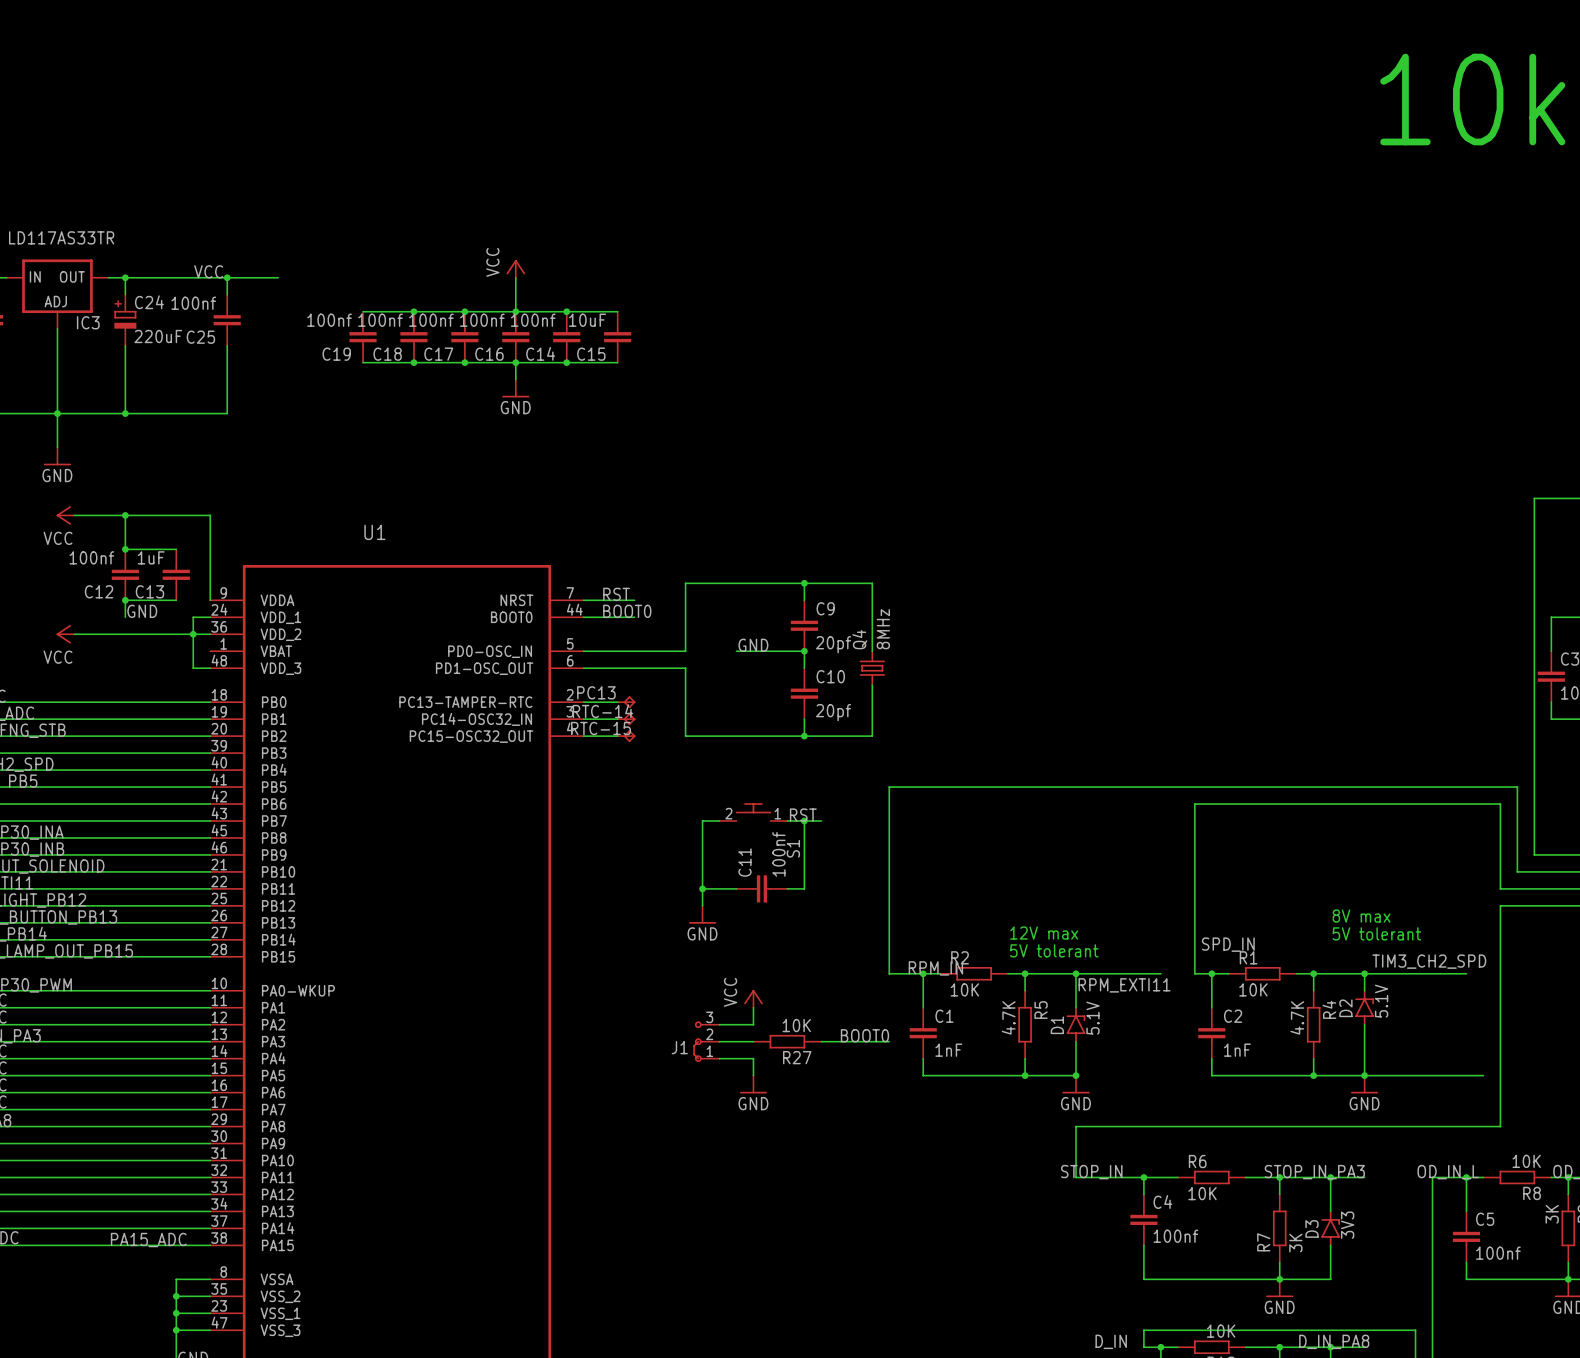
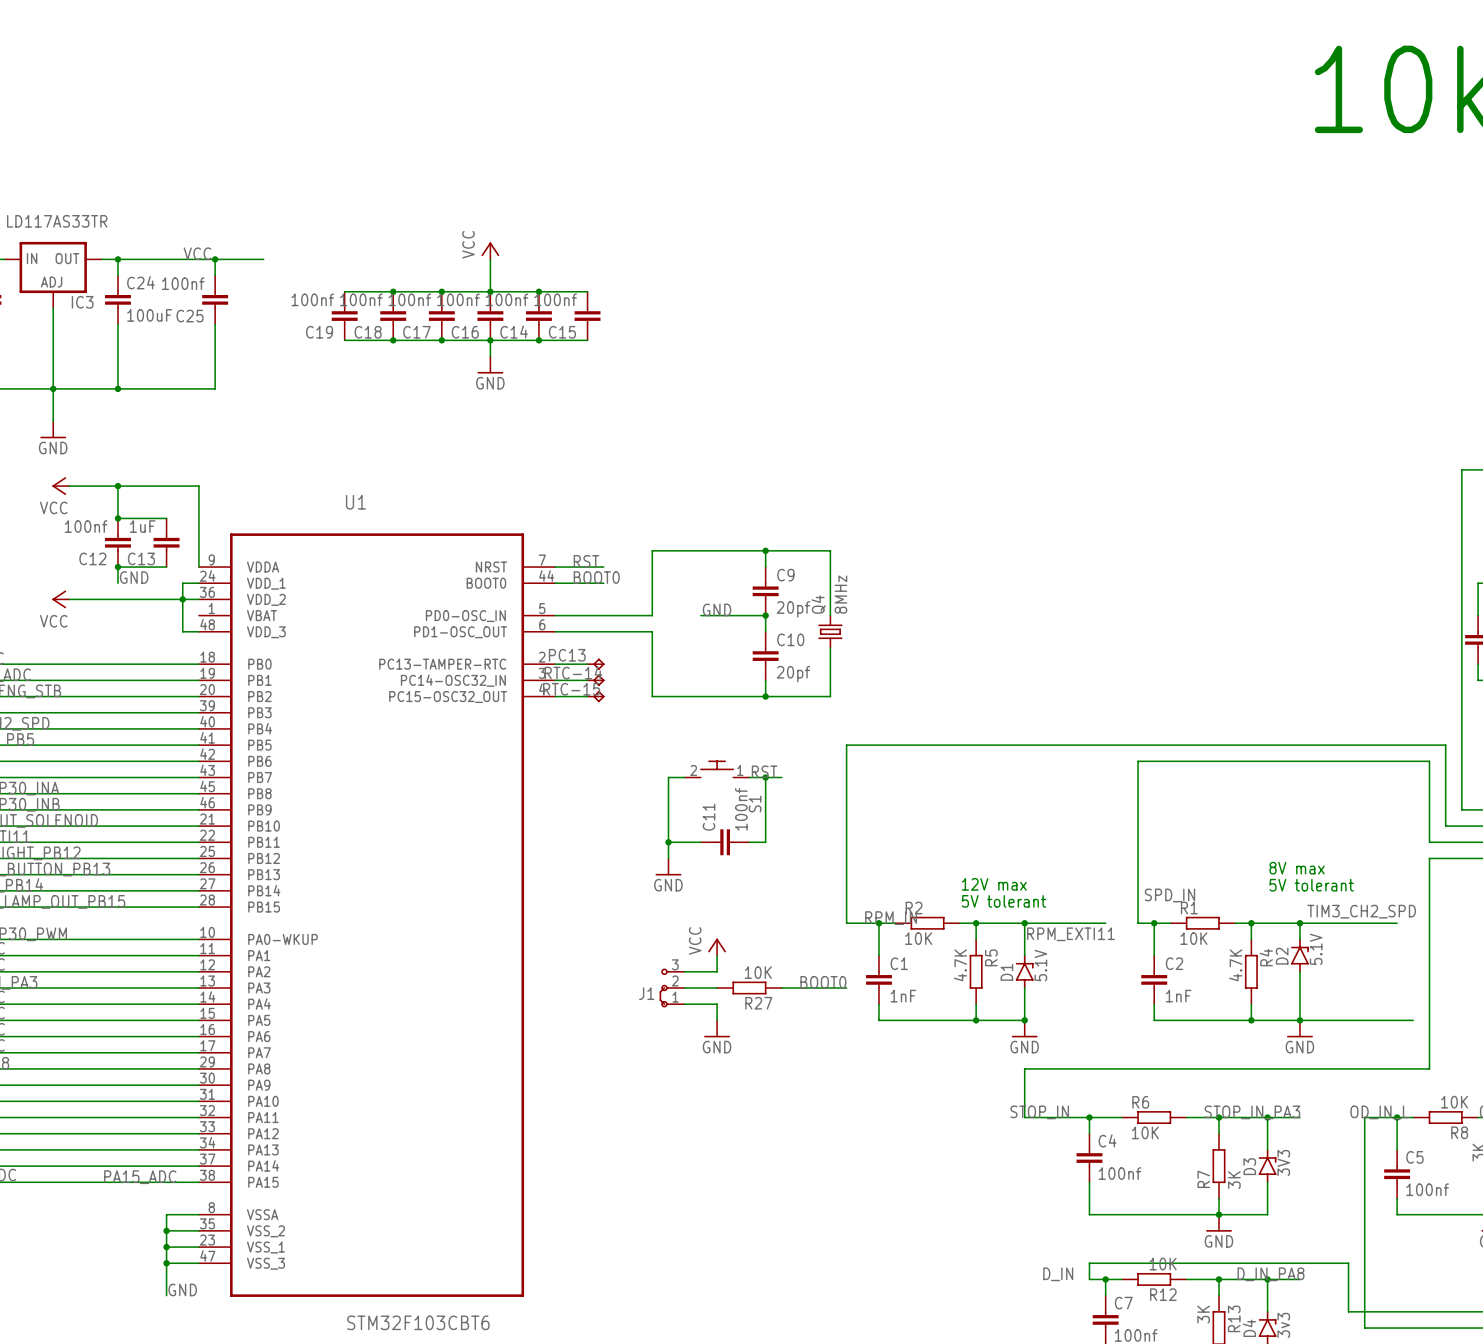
C24 symbol: [114, 294, 137, 346] -> [105, 275, 131, 325]
C15 value: 10uF (587, 320) -> 100nf (555, 299)
C24 value: 220uF (158, 336) -> 100uF (149, 315)

